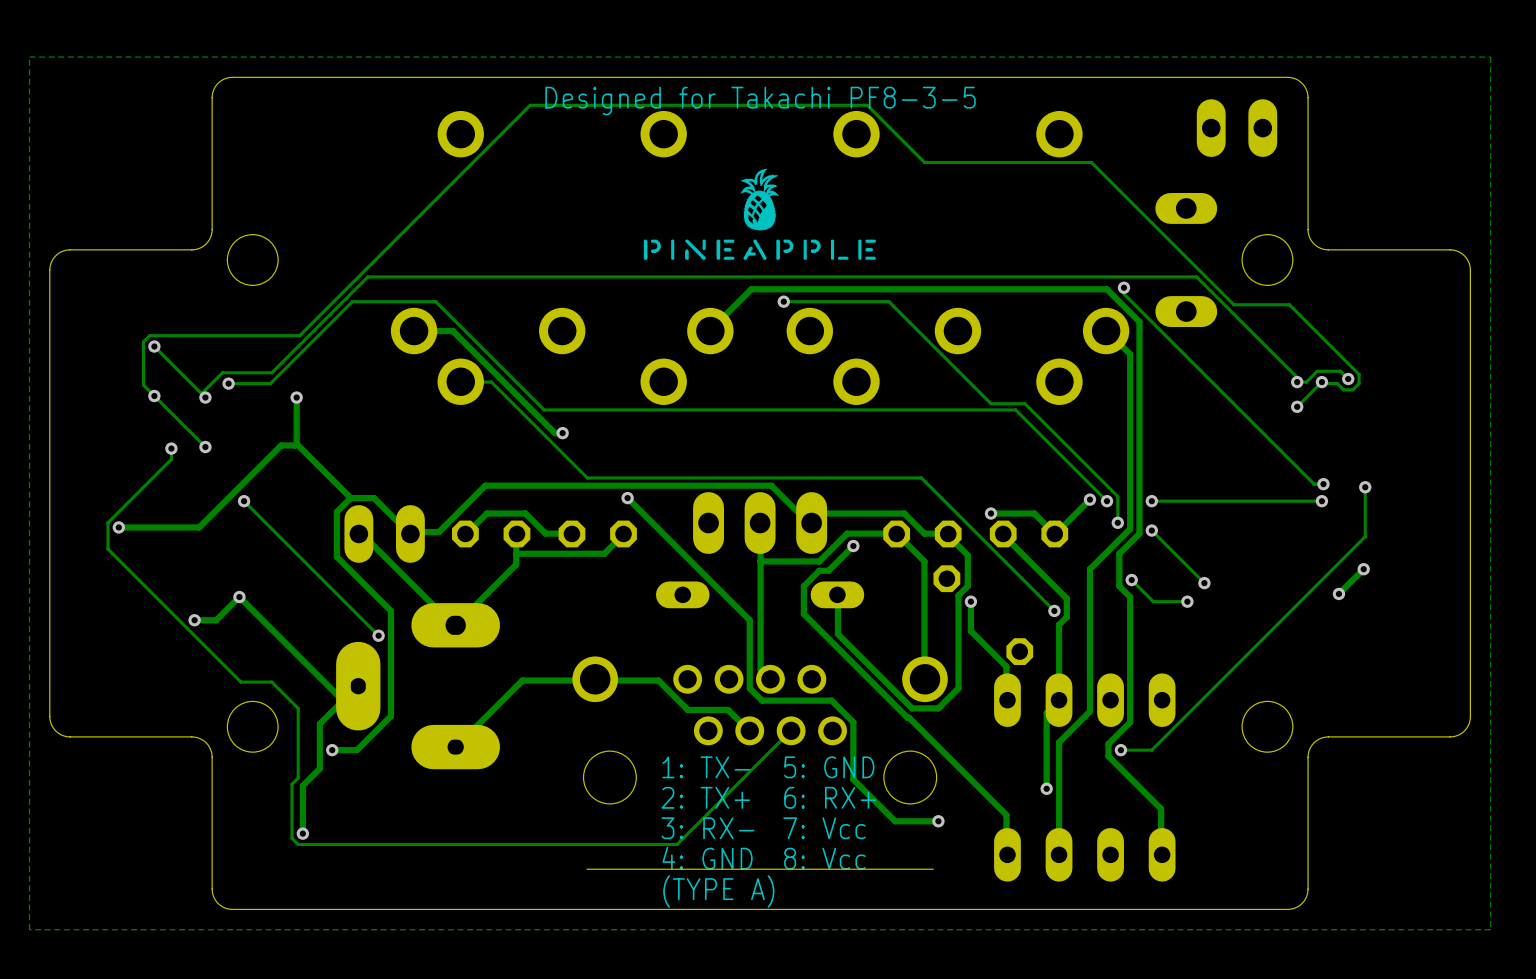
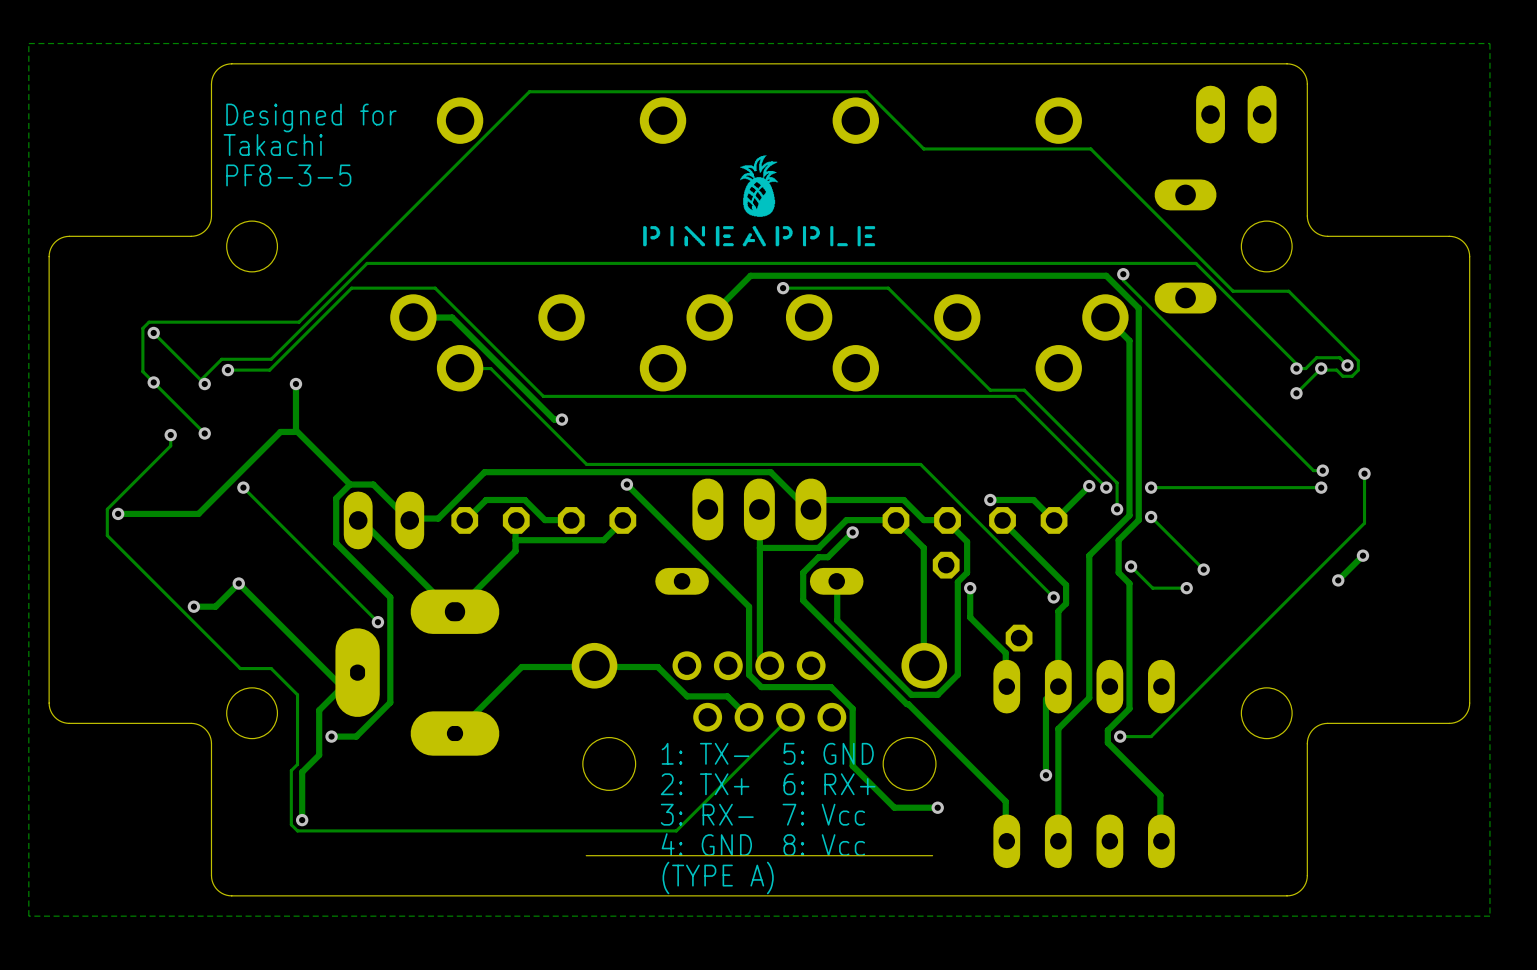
text: Designed for Takachi PF8-3-5 (760, 101) -> none
text: none -> Designed for (311, 117)
text: none -> Takachi (273, 145)
text: none -> PF8-3-5 (288, 175)

